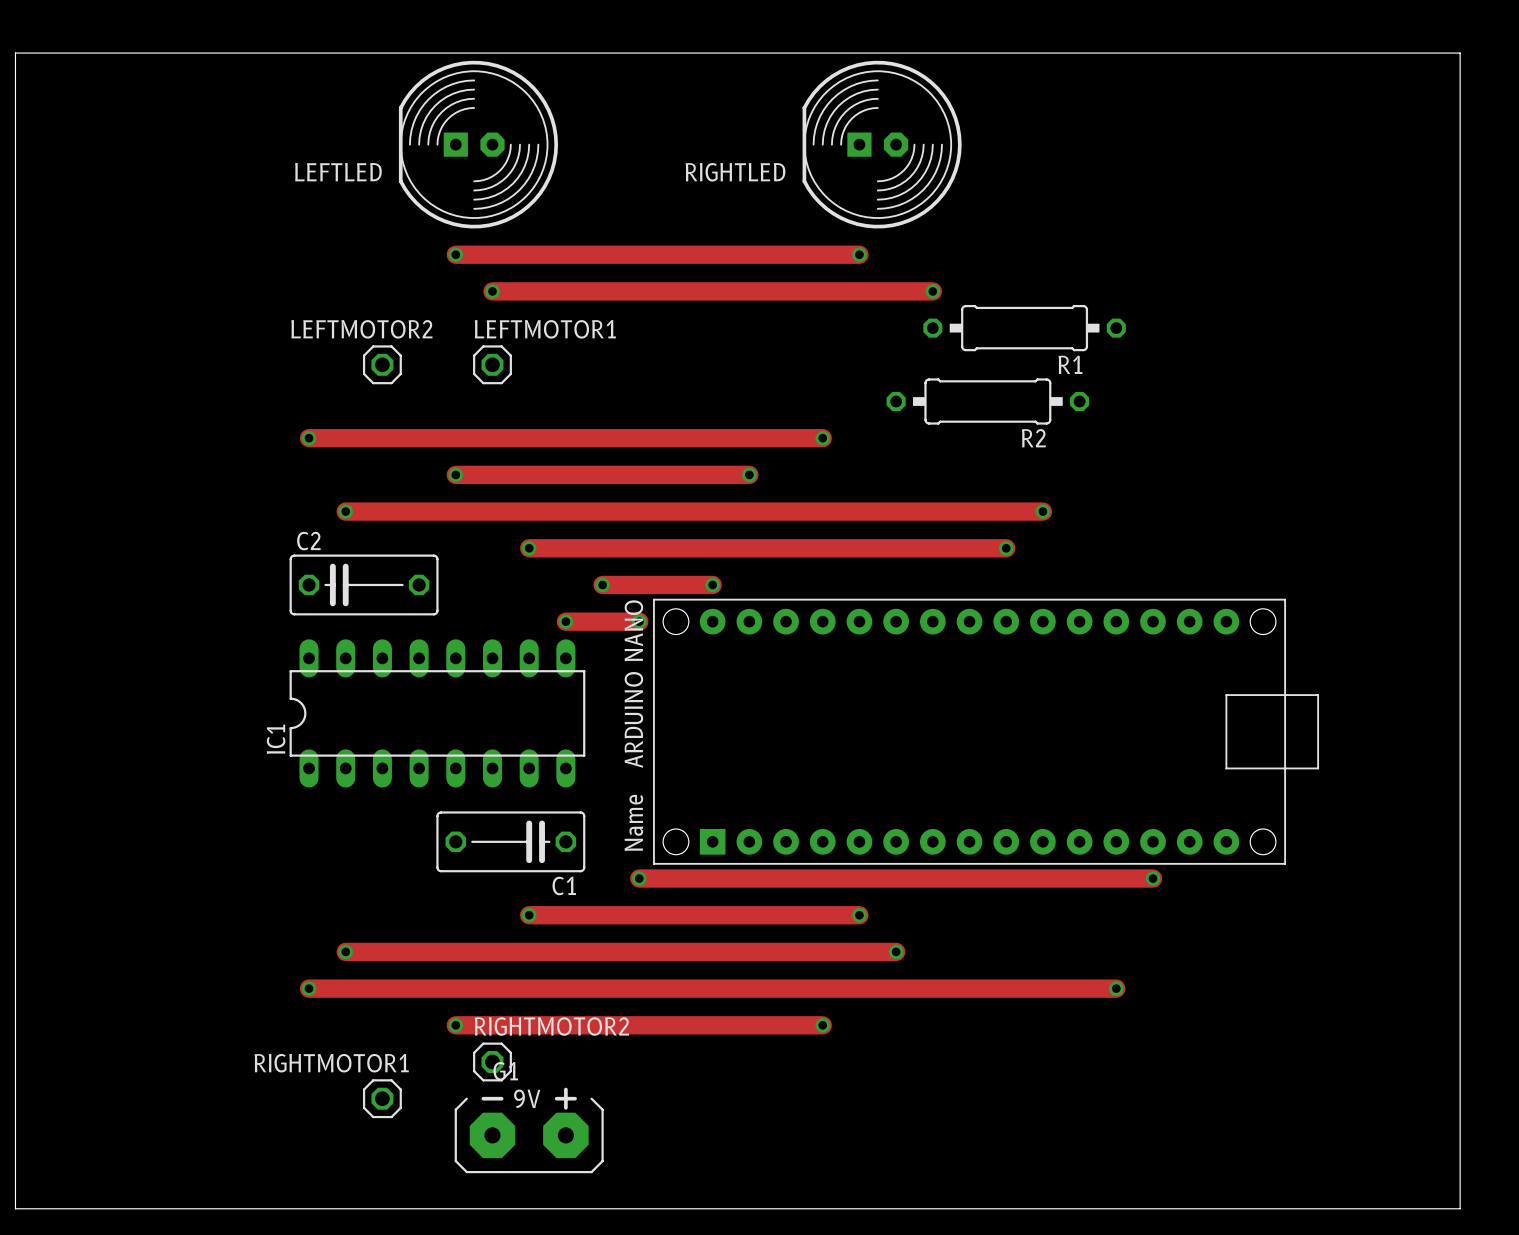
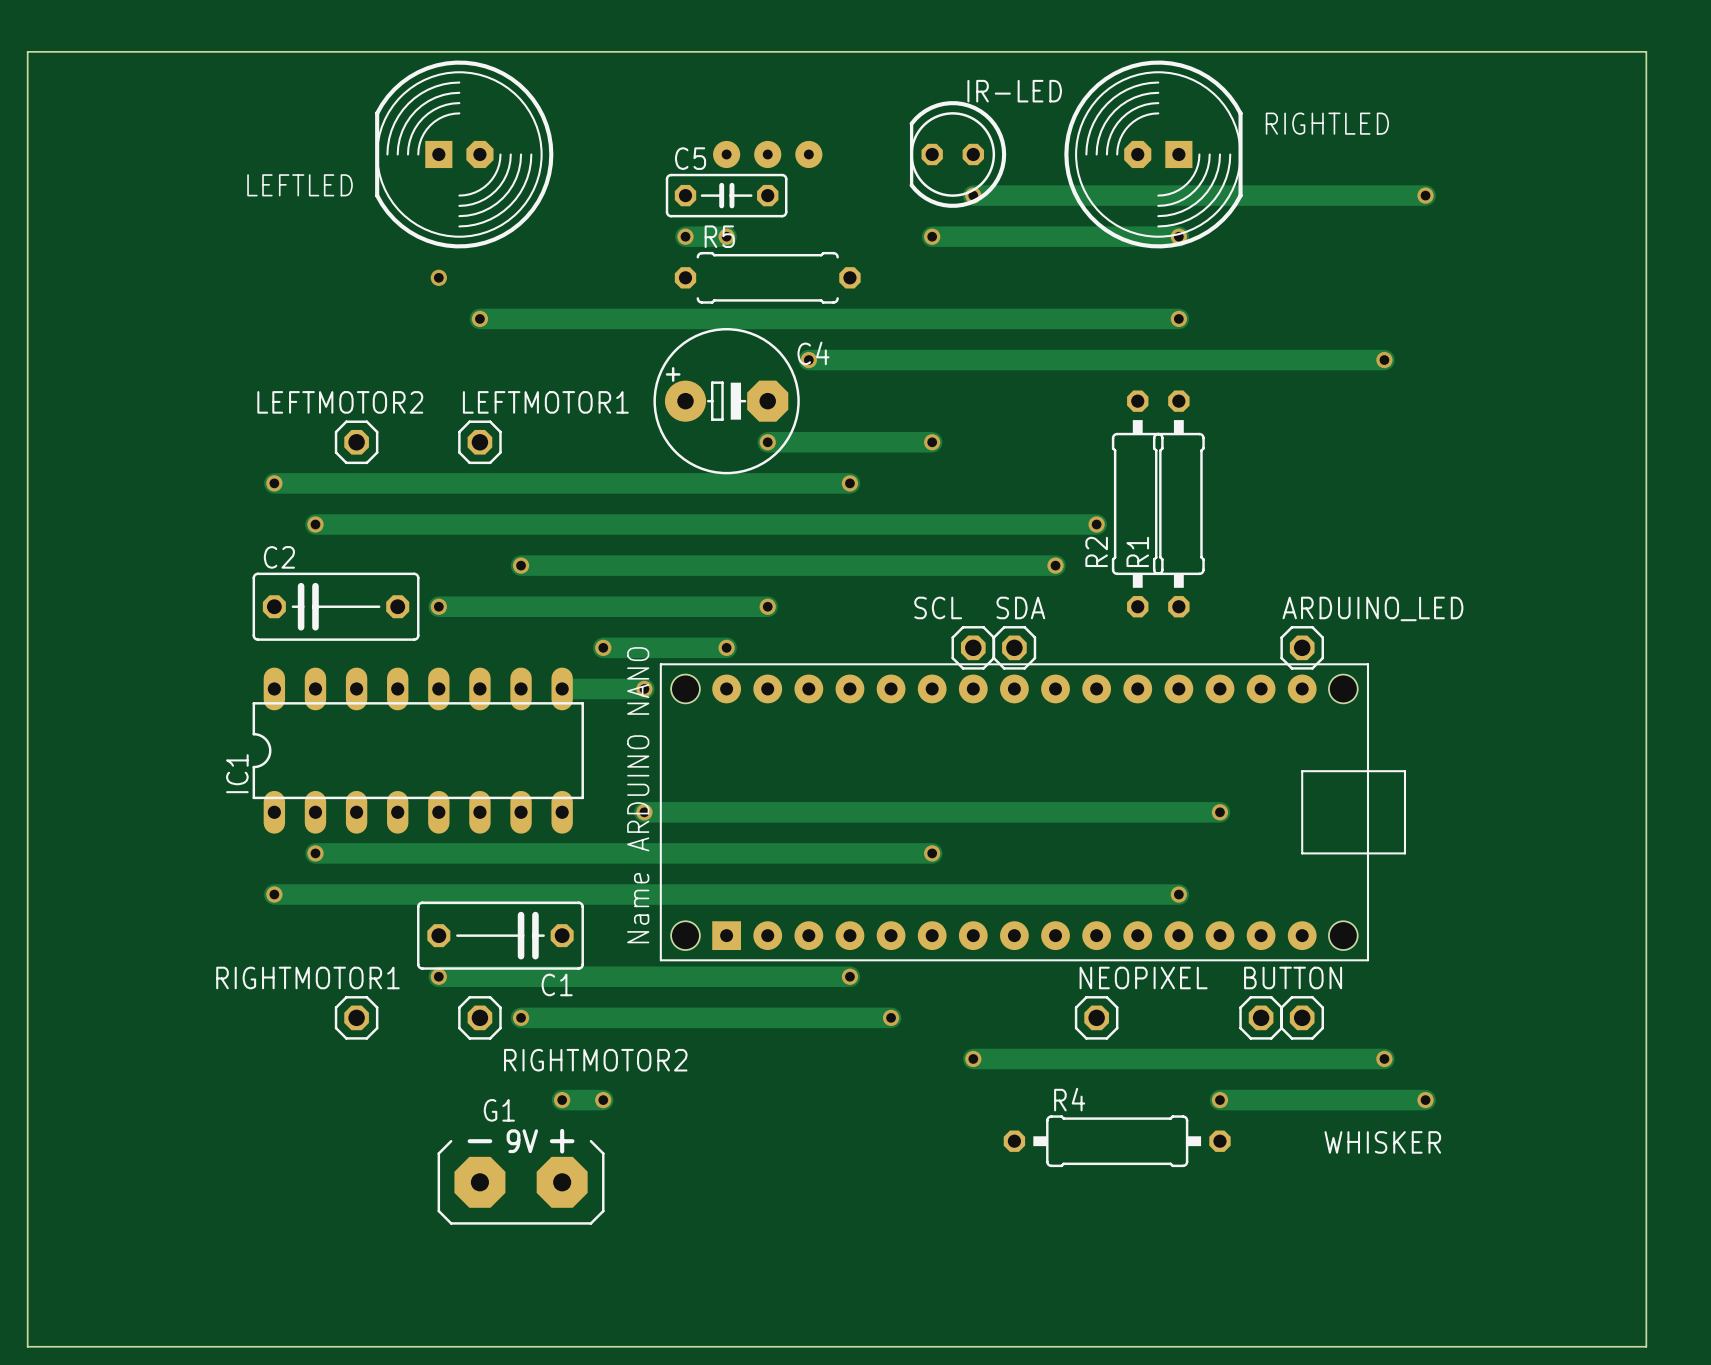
LEFTLED position: (478, 144) -> (464, 154)
part: none -> (767, 154)
IR-LED: none -> (957, 154)
RIGHTLED rotation: 0° (882, 144) -> 180° (1153, 154)
RIGHTLED position: (882, 144) -> (1153, 154)
C5: none -> (726, 195)
track: none -> (973, 195) (1425, 195)
via: none -> (973, 195)
via: none -> (1425, 195)
track: none -> (685, 236) (726, 236)
via: none -> (685, 236)
via: none -> (726, 236)
track: none -> (932, 236) (1178, 236)
via: none -> (932, 236)
via: none -> (1178, 236)
via: none -> (438, 277)
track: (455, 254) (859, 254) -> none
via: (455, 254) -> none
R5: none -> (767, 277)
via: (859, 254) -> none
track: none -> (479, 318) (562, 318)
via: none -> (479, 318)
via: (492, 291) -> none
via: (932, 291) -> none
via: none -> (1178, 318)
track: none -> (808, 360) (1384, 360)
via: none -> (808, 360)
R1 rotation: 0° (1024, 328) -> 90° clockwise (1178, 503)
R1 position: (1024, 328) -> (1178, 503)
via: none -> (1384, 360)
LEFTMOTOR2 position: (382, 364) -> (356, 442)
LEFTMOTOR1 position: (492, 364) -> (479, 442)
C4: none -> (726, 401)
track: none -> (767, 442) (932, 442)
via: none -> (767, 442)
via: none -> (932, 442)
R2 rotation: 0° (987, 401) -> 90° clockwise (1137, 503)
track: none -> (274, 483) (356, 483)
via: none -> (274, 483)
via: (309, 438) -> none
track: (749, 438) (822, 438) -> none
via: none -> (849, 483)
via: (822, 438) -> none
track: none -> (315, 524) (521, 524)
via: none -> (315, 524)
via position: (455, 474) -> (521, 565)
track: none -> (849, 524) (1096, 524)
via: (749, 474) -> none
via: none -> (1096, 524)
track: (345, 511) (455, 511) -> none
via: (345, 511) -> none
track: (932, 511) (1042, 511) -> (1055, 318) (1178, 318)
via: none -> (1055, 565)
via: (1042, 511) -> none
track: none -> (438, 606) (603, 606)
via: none -> (438, 606)
via: (529, 548) -> none
track: (675, 548) (1006, 548) -> none
via: none -> (767, 606)
via: (1006, 548) -> none
C2 position: (364, 584) -> (336, 606)
via: none -> (603, 647)
via: (602, 584) -> none
track: (639, 584) (712, 584) -> (603, 647) (685, 647)
via: none -> (726, 647)
via: (712, 584) -> none
SCL: none -> (973, 647)
SDA: none -> (1014, 647)
ARDUINO_LED: none -> (1302, 647)
track: (565, 621) (639, 621) -> (644, 688) (562, 688)
via: (639, 621) -> none
IC1 position: (437, 713) -> (418, 750)
via: none -> (644, 812)
part position: (986, 731) -> (1032, 812)
via: none -> (1219, 812)
via: none -> (315, 853)
via: none -> (932, 853)
track: none -> (274, 894) (1178, 894)
via: none -> (274, 894)
via: none -> (1178, 894)
C1 position: (510, 841) -> (500, 935)
track: none -> (438, 976) (726, 976)
via: none -> (438, 976)
via: (639, 878) -> none
track: (749, 878) (1153, 878) -> none
via: none -> (849, 976)
via: (1153, 878) -> none
via: none -> (521, 1017)
via: (529, 915) -> none
track: (786, 915) (859, 915) -> (521, 1017) (603, 1017)
via: none -> (891, 1017)
via: (859, 915) -> none
NEOPIXEL: none -> (1096, 1017)
BUTTON: none -> (1261, 1017)
WHISKER: none -> (1302, 1017)
track: (345, 951) (859, 951) -> (644, 812) (1219, 812)
via: (345, 951) -> none
via: none -> (973, 1058)
track: none -> (1014, 1058) (1384, 1058)
via: (896, 951) -> none
via: none -> (1384, 1058)
track: (309, 988) (492, 988) -> none
via: (309, 988) -> none
via: none -> (562, 1100)
track: (529, 988) (1079, 988) -> (315, 853) (932, 853)
via: none -> (603, 1100)
track: none -> (1261, 1100) (1425, 1100)
via position: (1116, 988) -> (1219, 1100)
via: none -> (1425, 1100)
track: (455, 1025) (822, 1025) -> none
via: (455, 1025) -> none
via: (822, 1025) -> none
R4: none -> (1117, 1141)
RIGHTMOTOR2 name position: RIGHTMOTOR2 (551, 1026) -> RIGHTMOTOR2 (595, 1060)
RIGHTMOTOR2 position: (492, 1062) -> (479, 1017)
RIGHTMOTOR1 position: (382, 1098) -> (356, 1017)
G1 position: (529, 1130) -> (521, 1176)

